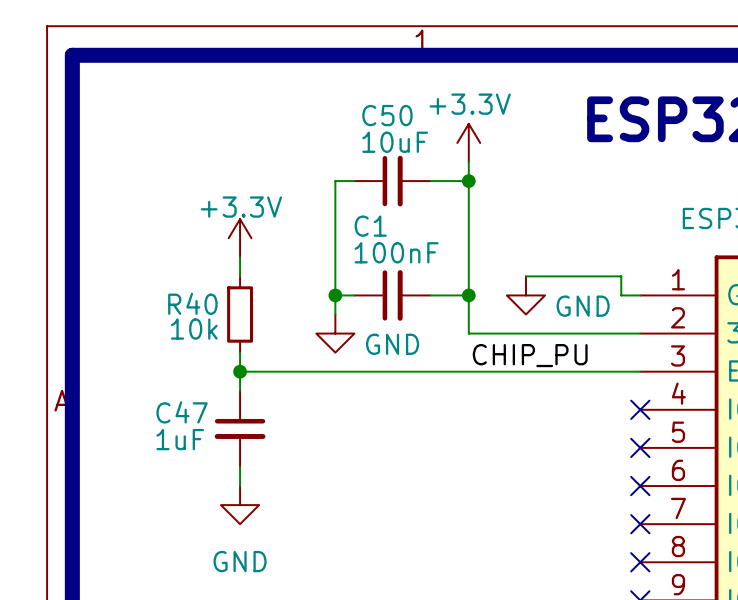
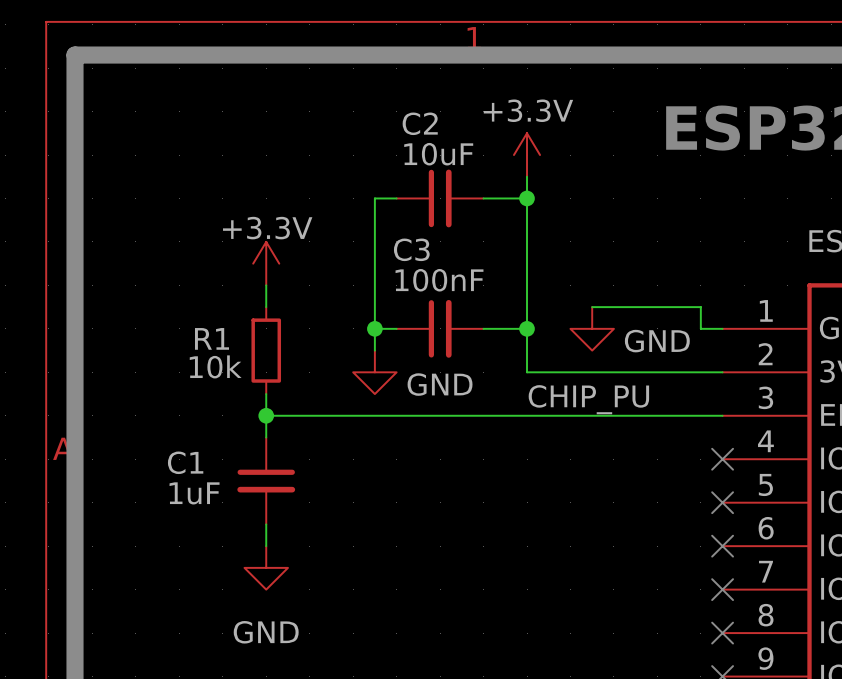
C50 name: C50 (387, 115) -> C2 (420, 123)
C1 name: C1 (370, 226) -> C3 (411, 249)
R40 name: R40 (192, 303) -> R1 (211, 338)
C47 name: C47 (182, 412) -> C1 (185, 462)

